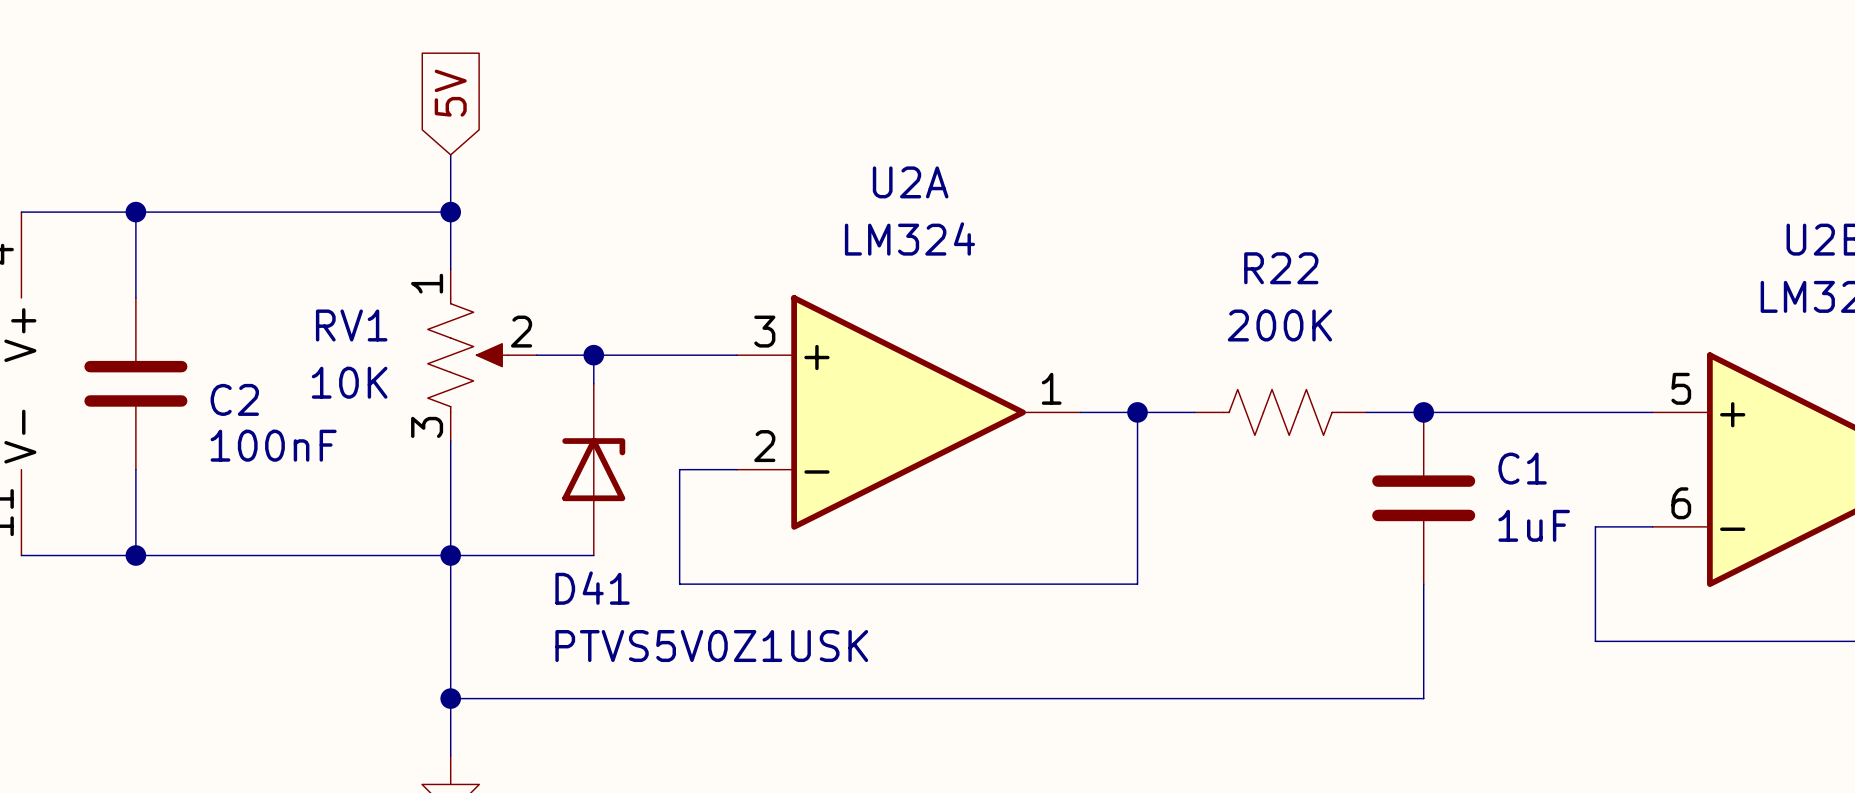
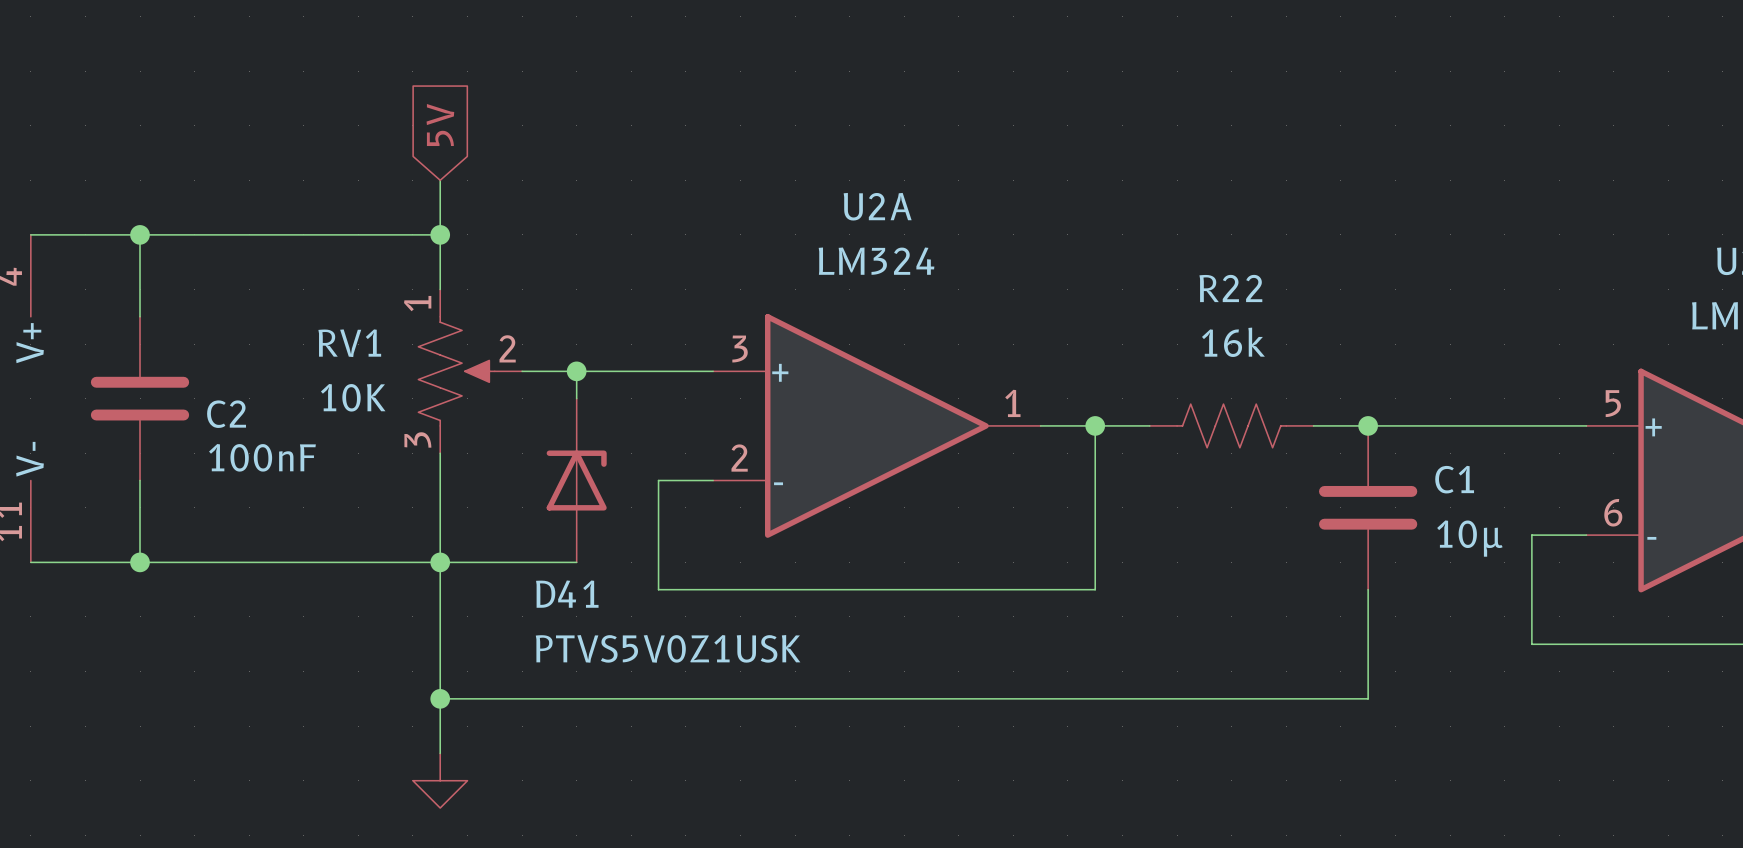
R22 value: 200K (1279, 325) -> 16k (1233, 342)
C1 value: 1uF (1534, 525) -> 10µ (1469, 538)

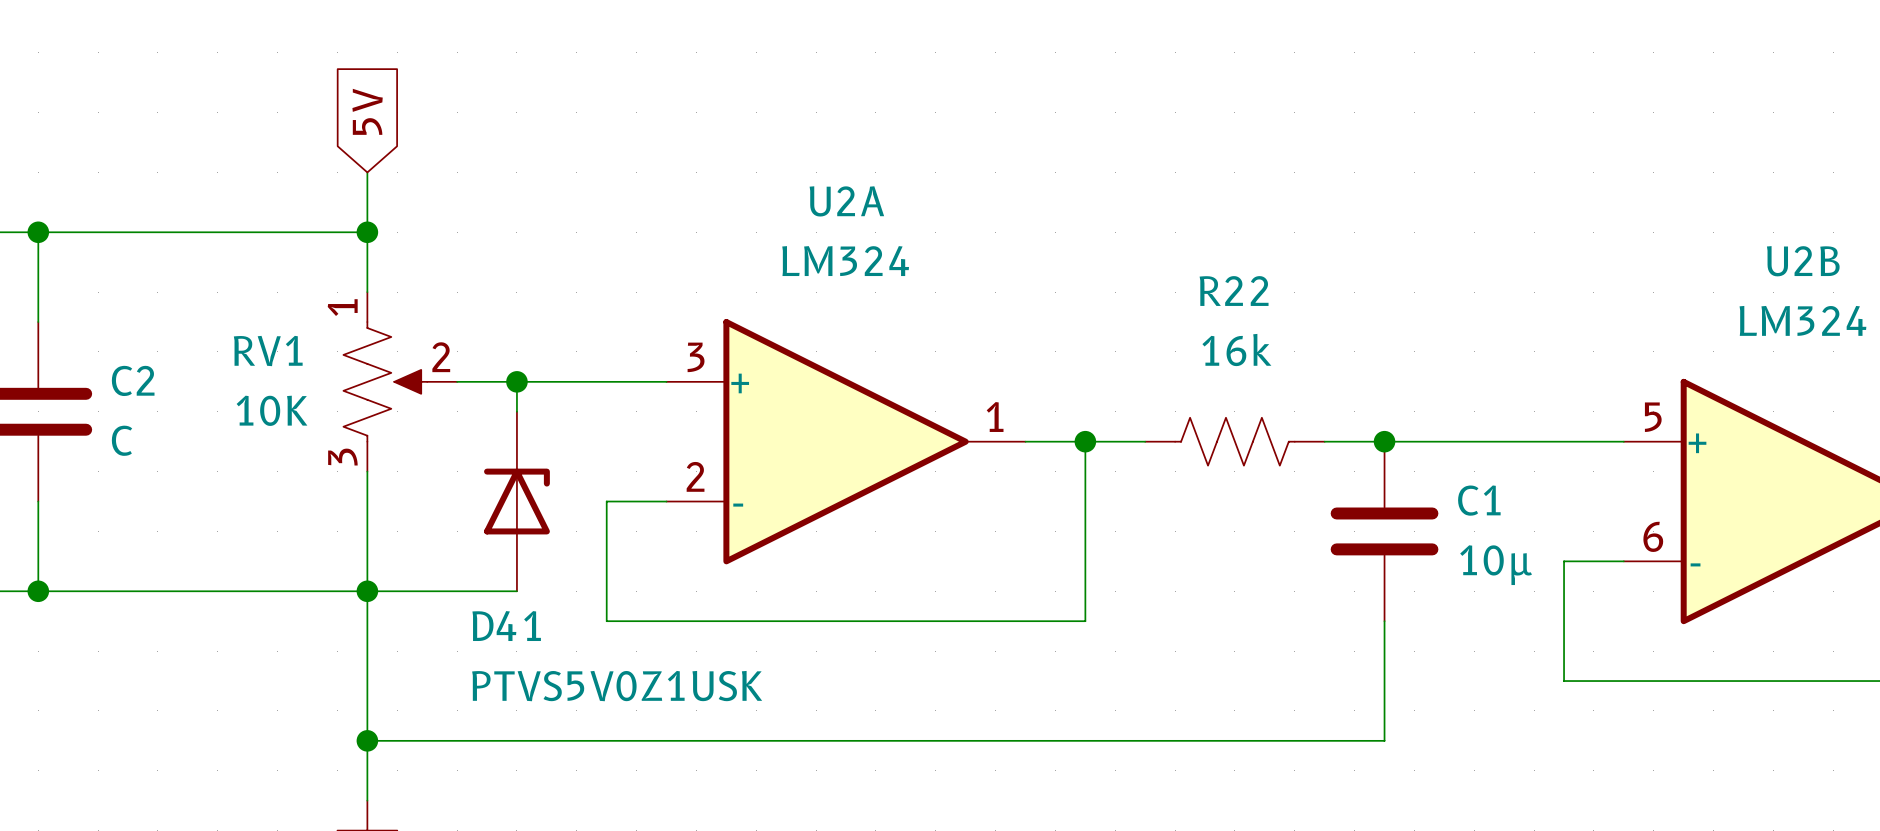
C2 name position: C2 (226, 414) -> C2 (133, 380)
C2 value: 100nF (262, 457) -> C (122, 440)

